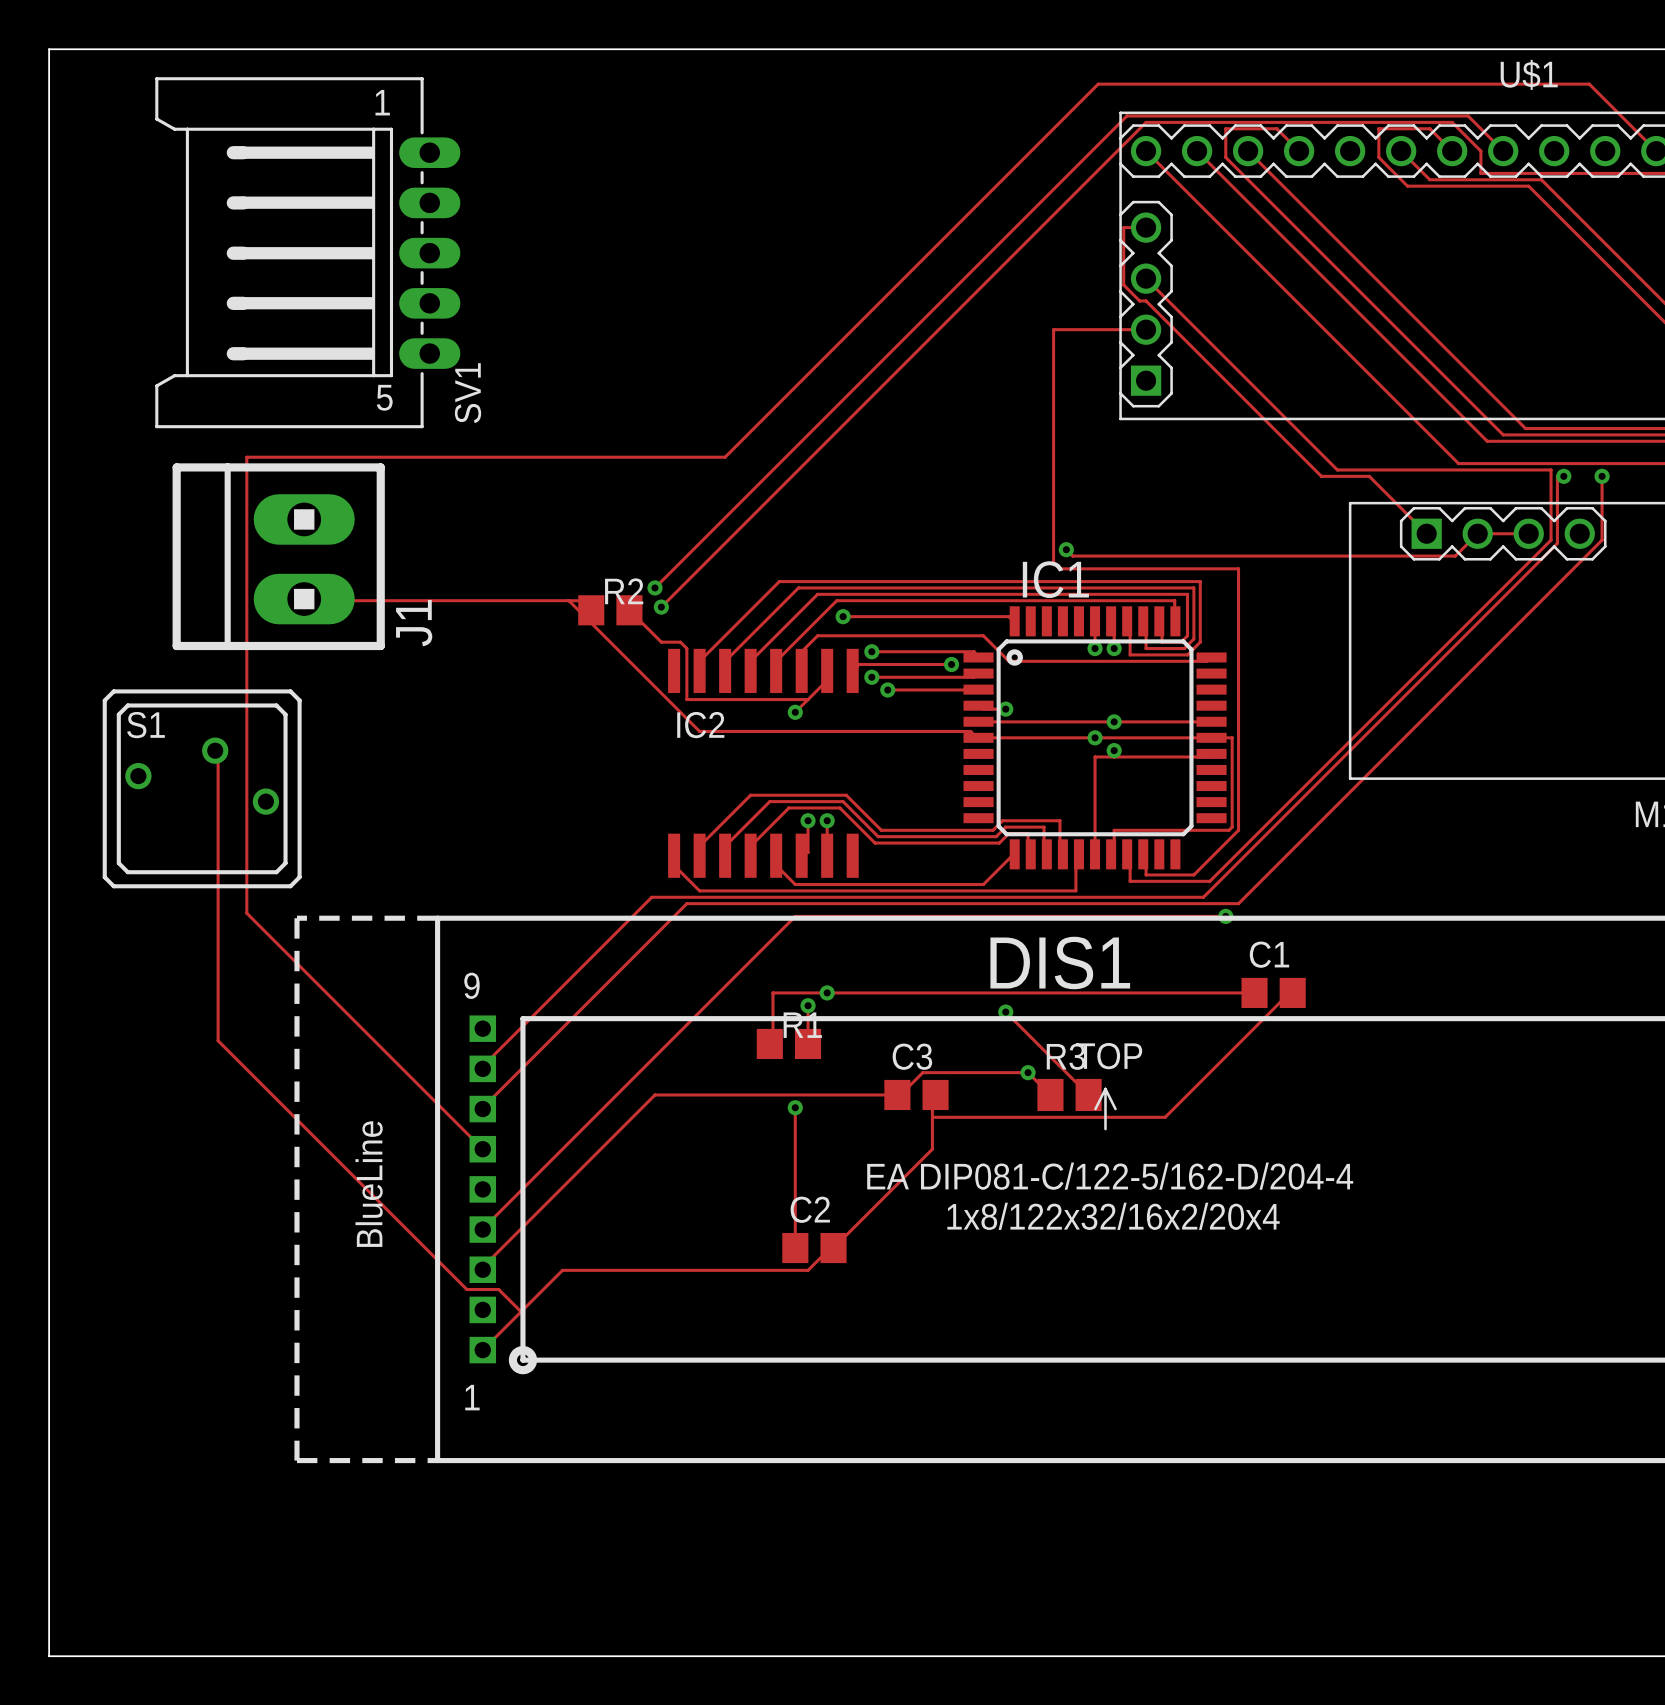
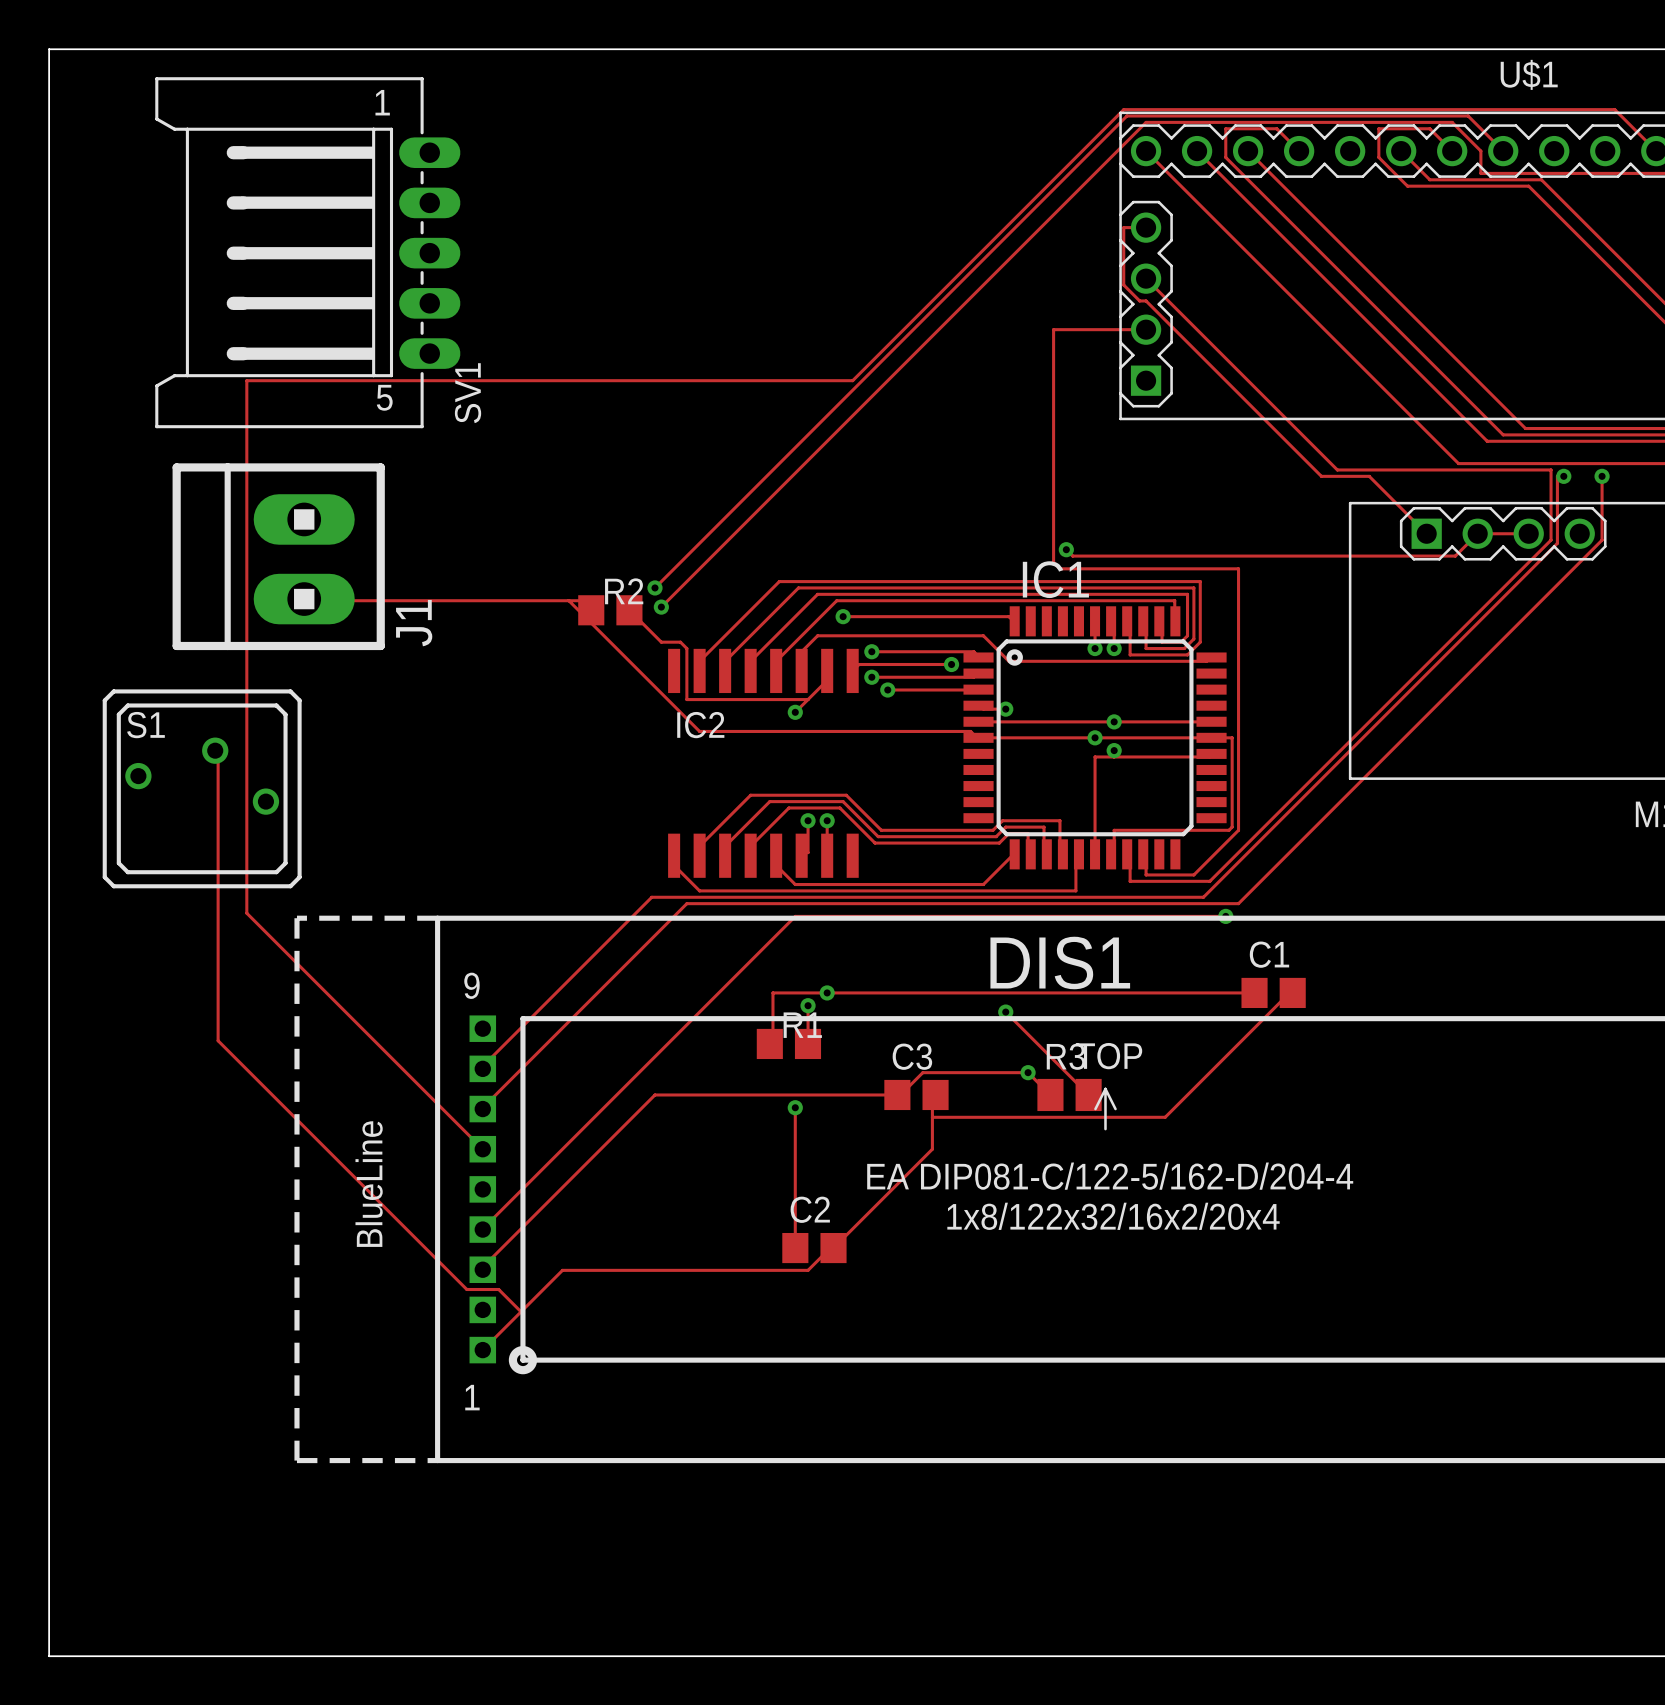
track: (1614, 109) (1589, 84) (1098, 84) (725, 457) (246, 457) -> (1614, 109) (1123, 109) (852, 380) (246, 380) (246, 457)

